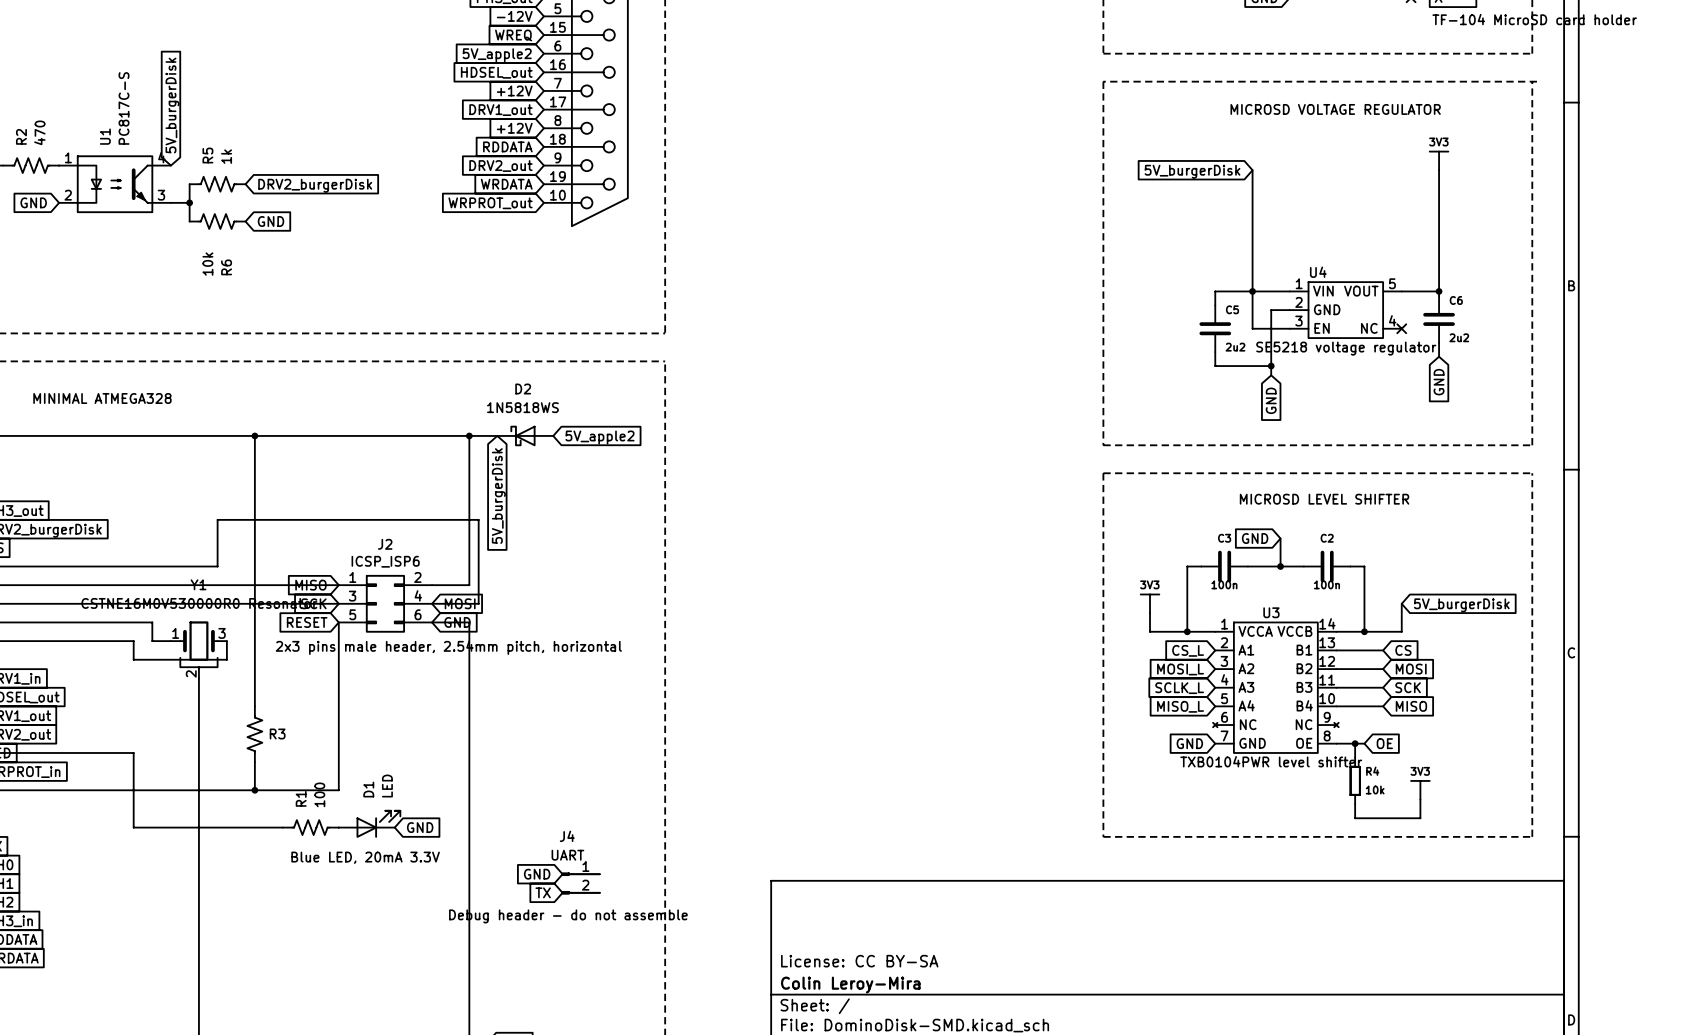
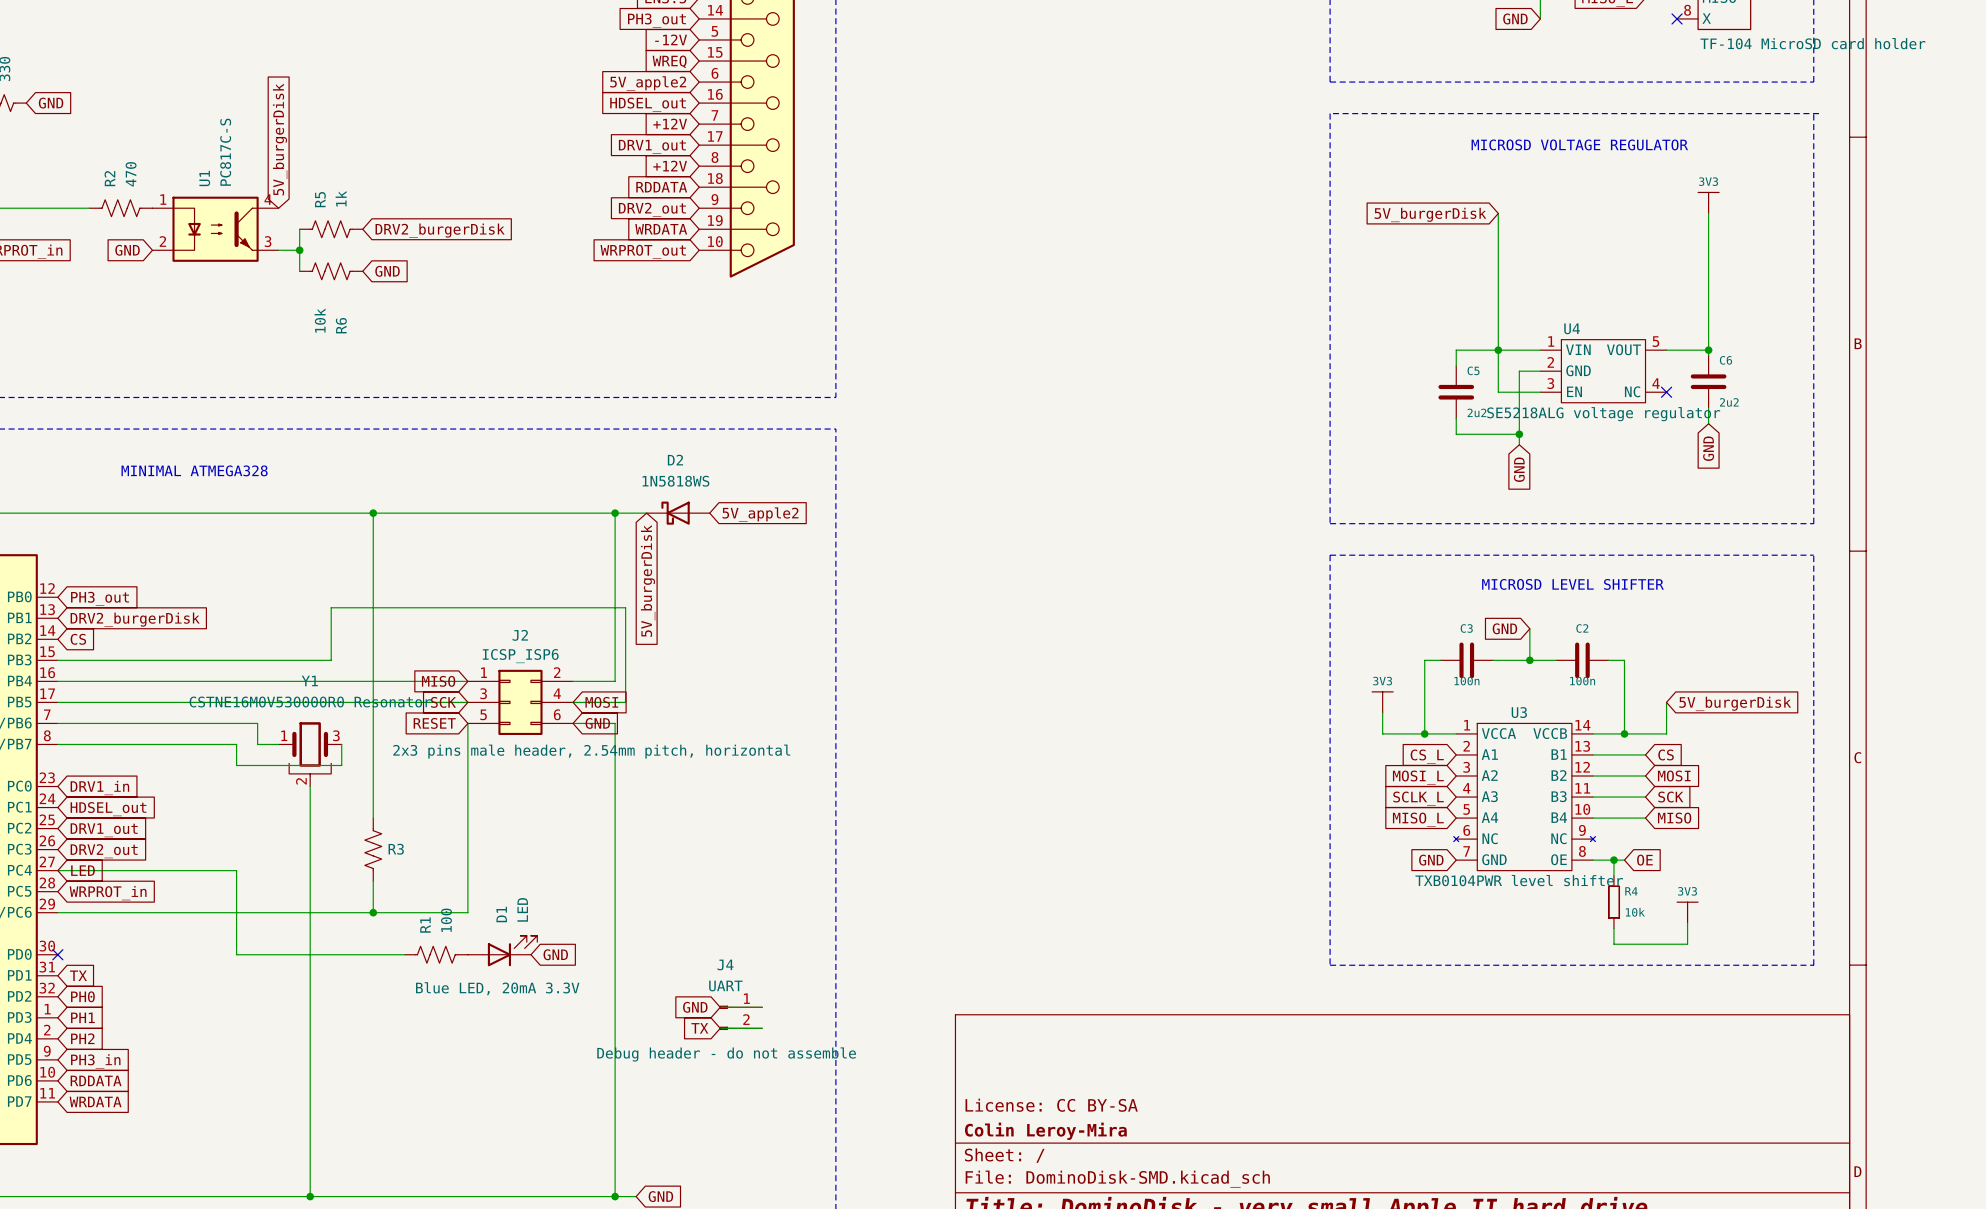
U4 value: SE5218 voltage regulator (1346, 348) -> SE5218ALG voltage regulator (1603, 414)

